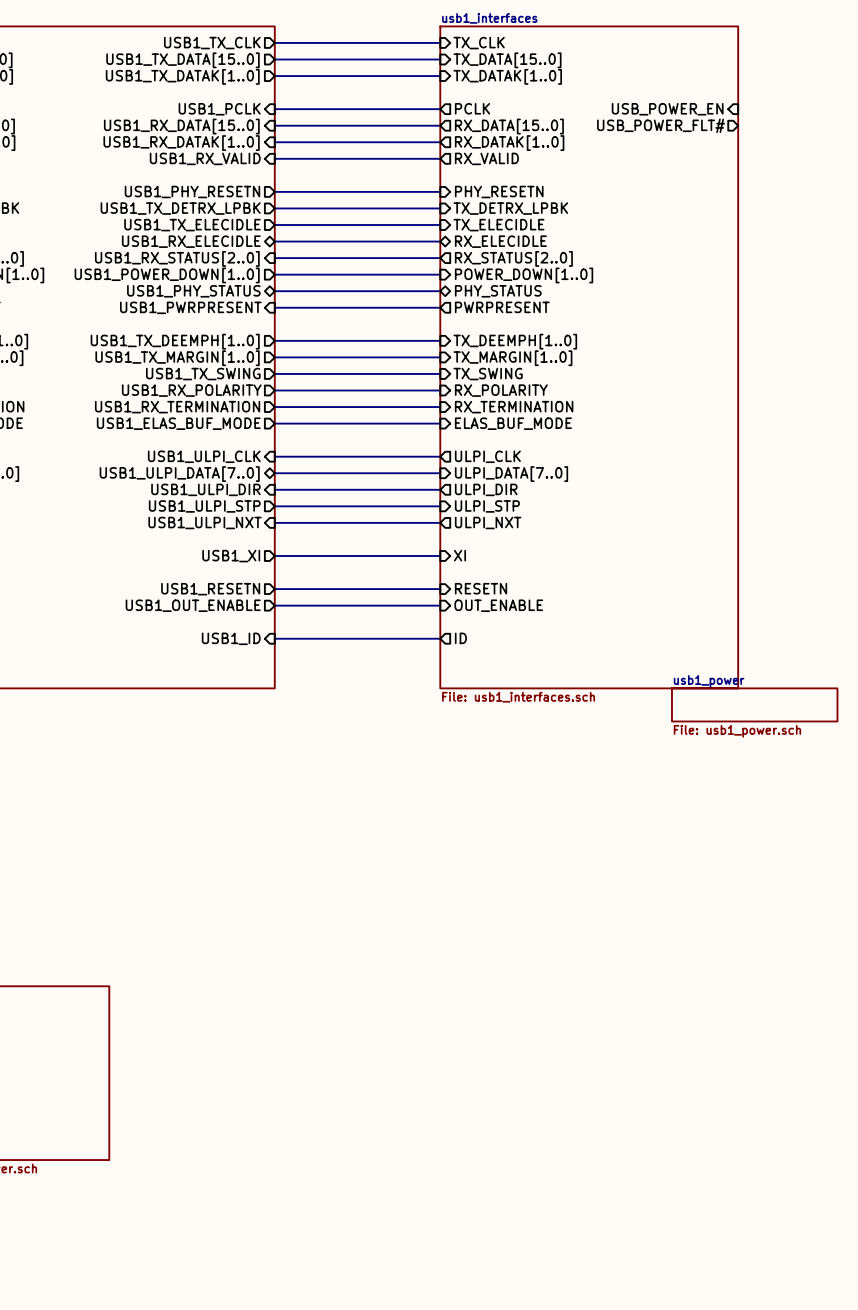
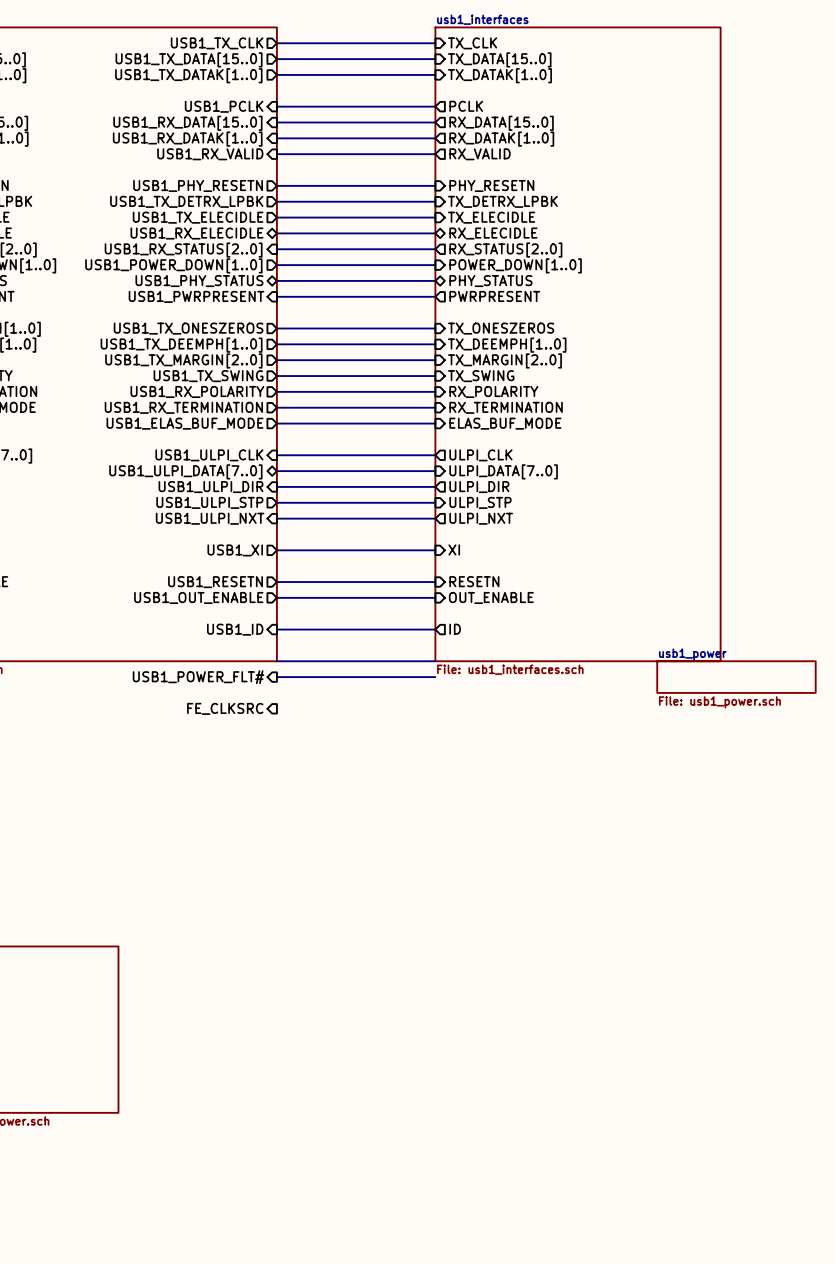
sheet pin: USB_POWER_EN (667, 109) -> none
sheet pin: USB_POWER_FLT# (661, 125) -> none
sheet pin: USB1_TX_DEEMPH[1..0] (175, 341) -> USB1_TX_ONESZEROS (188, 328)
sheet pin: TX_DEEMPH[1..0] (515, 341) -> TX_ONESZEROS (501, 328)
sheet pin: USB1_TX_MARGIN[1..0] (177, 358) -> USB1_TX_DEEMPH[1..0] (181, 345)
sheet pin: TX_MARGIN[1..0] (512, 358) -> TX_DEEMPH[1..0] (507, 345)
sheet pin: USB1_TX_SWING (203, 374) -> USB1_TX_MARGIN[2..0] (183, 360)
sheet pin: TX_SWING (488, 374) -> TX_MARGIN[2..0] (504, 360)
sheet pin: USB1_RX_POLARITY (191, 390) -> USB1_TX_SWING (208, 376)
sheet pin: RX_POLARITY (501, 390) -> TX_SWING (481, 376)
sheet pin: USB1_RX_TERMINATION (177, 407) -> USB1_RX_POLARITY (197, 391)
sheet pin: RX_TERMINATION (514, 407) -> RX_POLARITY (493, 391)
sheet pin: USB1_ELAS_BUF_MODE (178, 423) -> USB1_RX_TERMINATION (183, 407)
sheet pin: ELAS_BUF_MODE (513, 423) -> RX_TERMINATION (506, 407)
sheet pin: none -> USB1_ELAS_BUF_MODE (184, 423)
sheet pin: none -> ELAS_BUF_MODE (505, 423)
sheet pin: USB1_ULPI_CLK (204, 456) -> none
wire: (274, 456) (440, 456) -> (276, 423) (435, 423)
sheet pin: ULPI_CLK (487, 456) -> none
bus: (274, 473) (440, 473) -> (276, 471) (435, 471)
sheet pin shape: bidirectional (179, 474) -> input (209, 455)
sheet pin: USB1_ULPI_DATA[7..0] (179, 474) -> USB1_ULPI_CLK (209, 455)
sheet pin shape: input (511, 474) -> output (480, 455)
sheet pin: ULPI_DATA[7..0] (511, 474) -> ULPI_CLK (480, 455)
sheet pin shape: input (205, 489) -> bidirectional (185, 471)
sheet pin: USB1_ULPI_DIR (205, 489) -> USB1_ULPI_DATA[7..0] (185, 471)
sheet pin shape: output (486, 489) -> input (503, 471)
sheet pin: ULPI_DIR (486, 489) -> ULPI_DATA[7..0] (503, 471)
sheet pin shape: output (204, 506) -> input (211, 487)
sheet pin: USB1_ULPI_STP (204, 506) -> USB1_ULPI_DIR (211, 487)
sheet pin shape: input (487, 506) -> output (479, 487)
sheet pin: ULPI_STP (487, 506) -> ULPI_DIR (479, 487)
sheet pin shape: input (204, 522) -> output (209, 502)
sheet pin: USB1_ULPI_NXT (204, 522) -> USB1_ULPI_STP (209, 502)
sheet pin shape: output (488, 522) -> input (480, 502)
sheet pin: ULPI_NXT (488, 522) -> ULPI_STP (480, 502)
sheet pin: none -> USB1_ULPI_NXT (210, 518)
sheet pin: none -> ULPI_NXT (481, 518)
wire: (274, 555) (440, 555) -> (276, 518) (435, 518)
sheet pin position: XI (459, 555) -> XI (454, 549)
sheet pin position: USB1_XI (231, 556) -> USB1_XI (235, 550)
sheet pin: RESETN (481, 588) -> none
sheet pin: USB1_RESETN (210, 589) -> none
wire: (274, 589) (440, 589) -> (276, 550) (435, 550)
sheet pin: USB1_OUT_ENABLE (193, 605) -> USB1_RESETN (215, 582)
sheet pin: OUT_ENABLE (498, 605) -> RESETN (474, 581)
sheet pin: none -> USB1_OUT_ENABLE (198, 597)
sheet pin: none -> OUT_ENABLE (491, 597)
sheet pin position: USB1_ID (231, 638) -> USB1_ID (235, 629)
wire: (274, 638) (440, 638) -> (276, 597) (435, 597)
sheet pin position: ID (460, 638) -> ID (455, 629)
wire: none -> (276, 629) (435, 629)
wire: none -> (276, 661) (435, 661)
wire: none -> (276, 677) (435, 677)
sheet pin: none -> USB1_POWER_FLT# (198, 677)
sheet pin: none -> FE_CLKSRC (225, 708)

